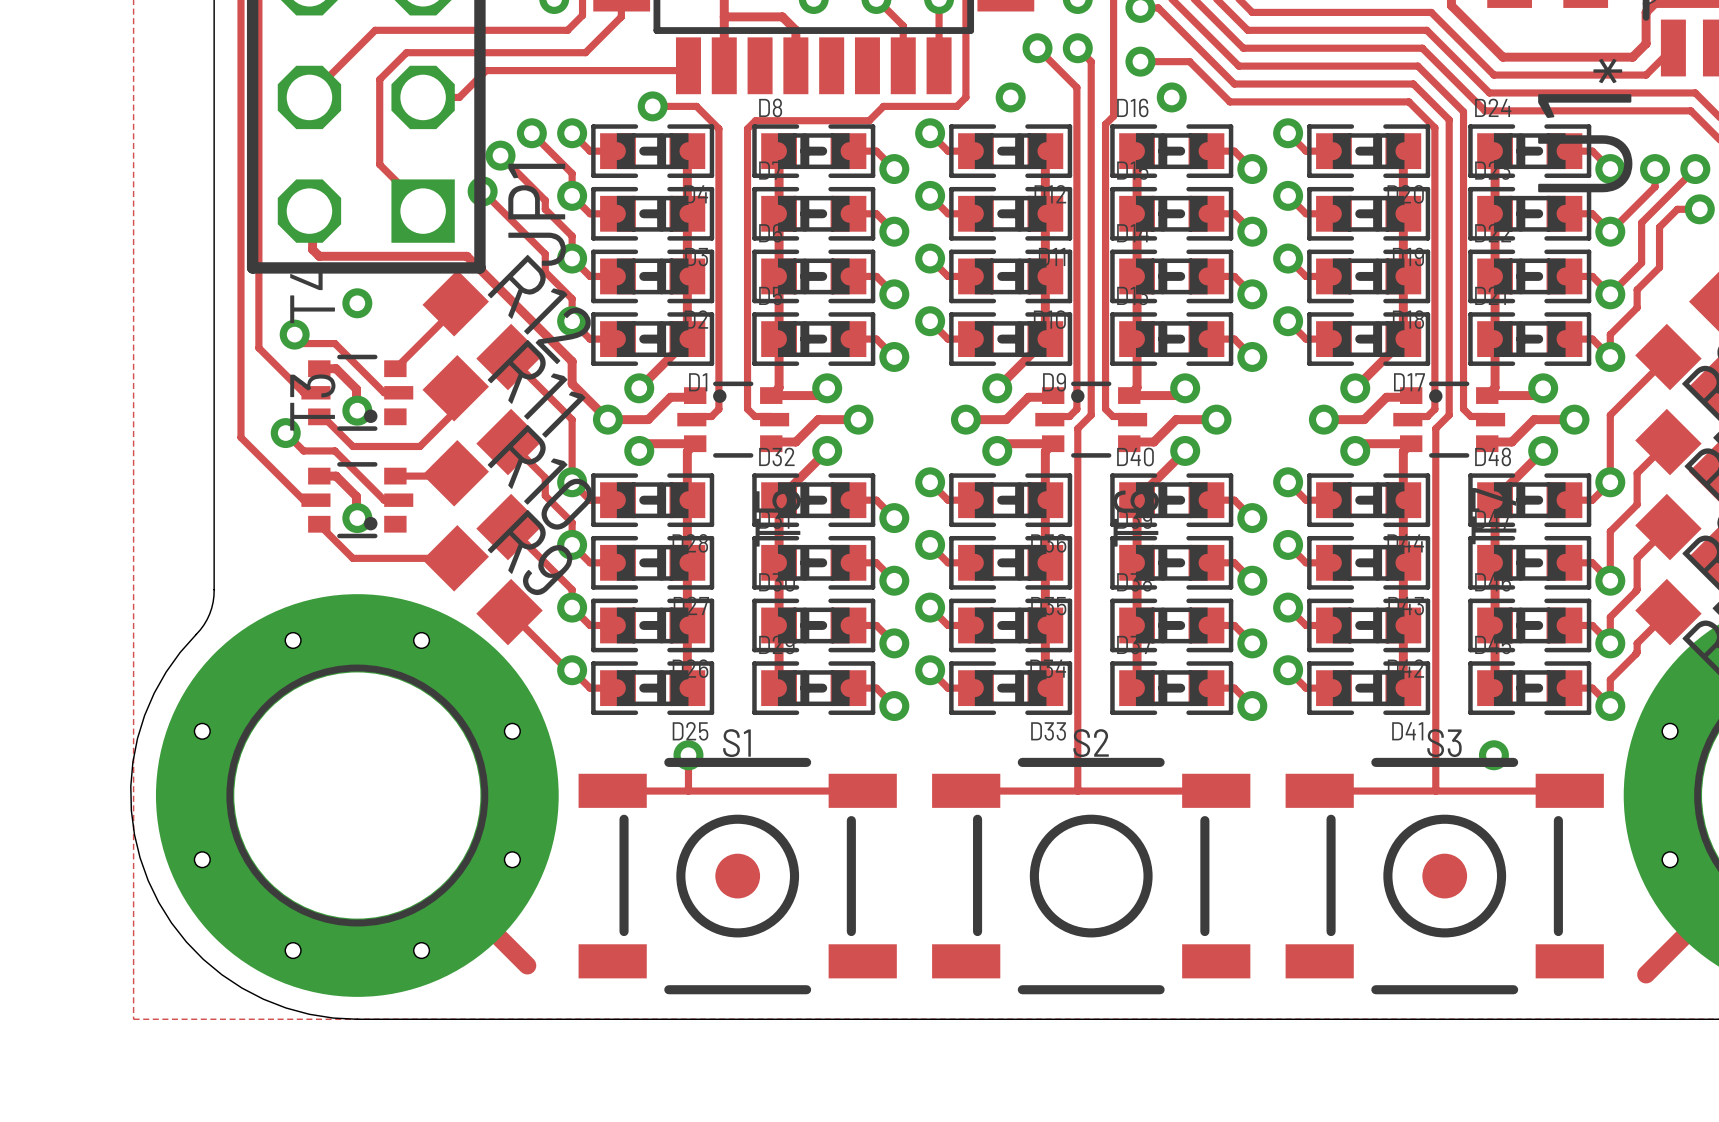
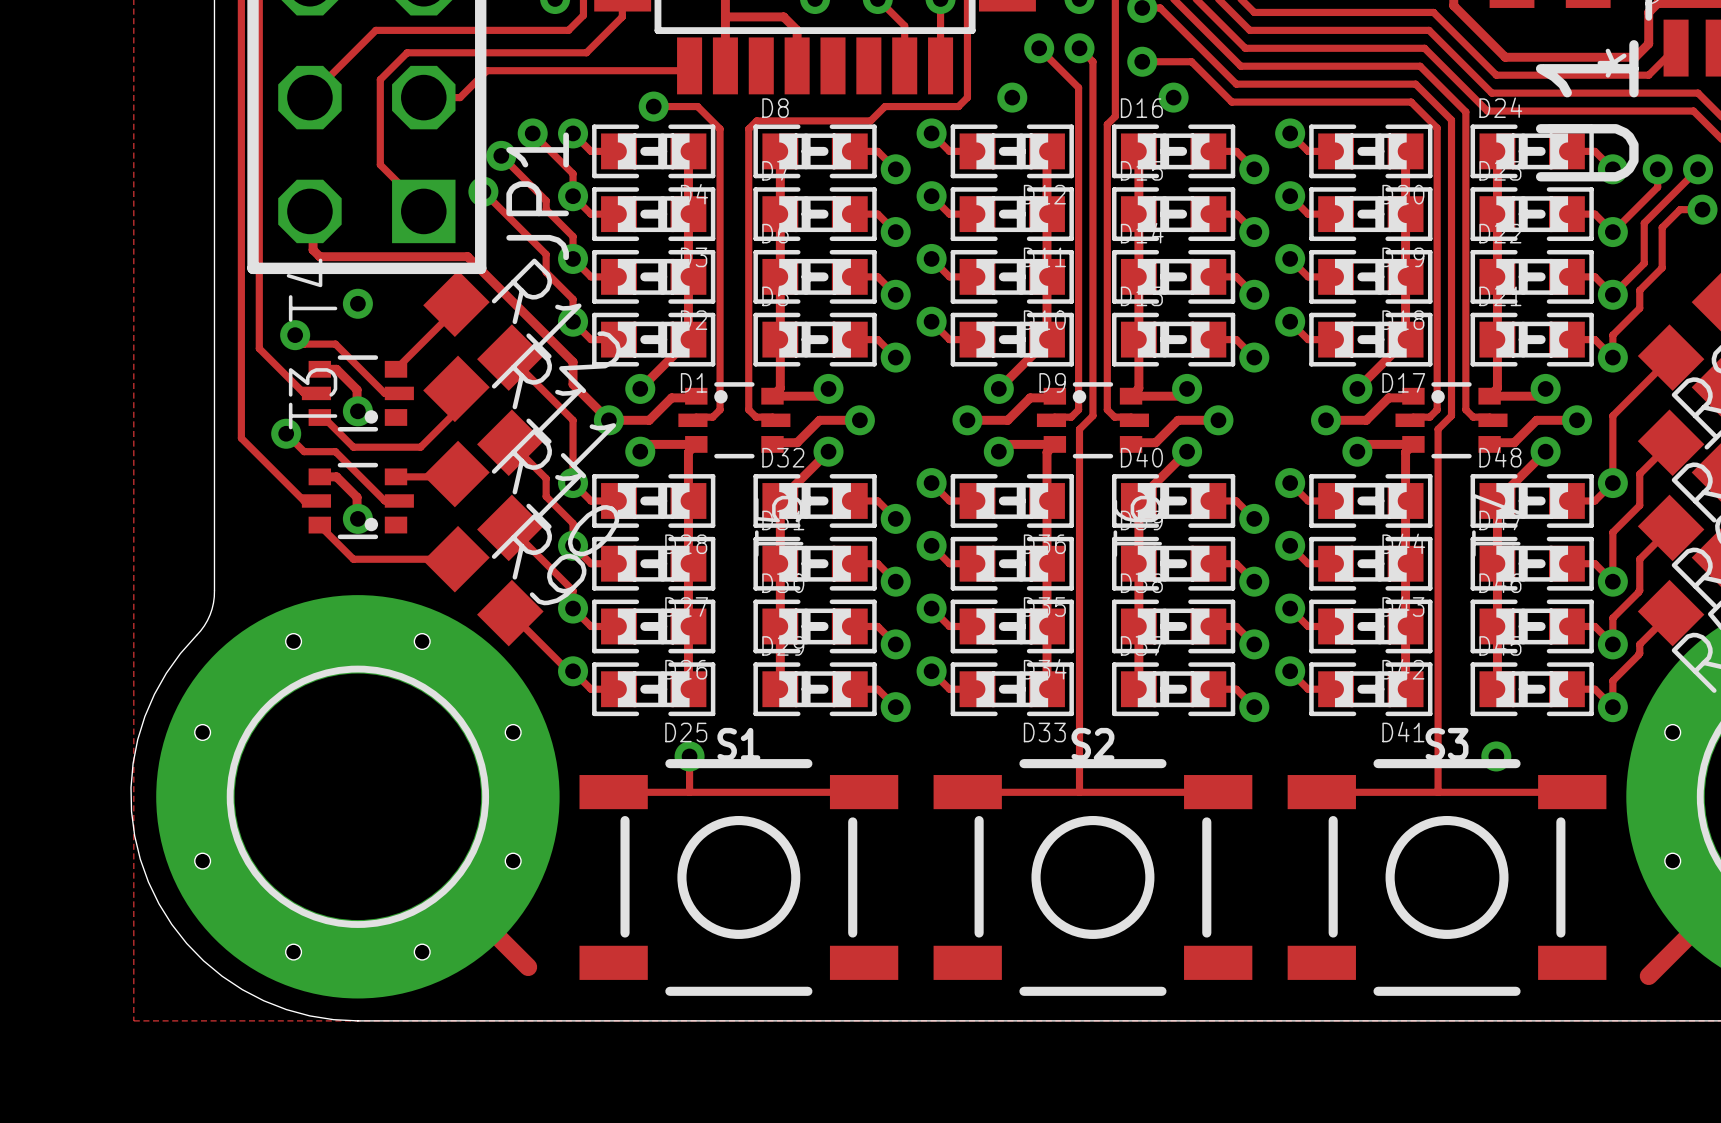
part: (737, 876) -> none
part: (1444, 876) -> none

